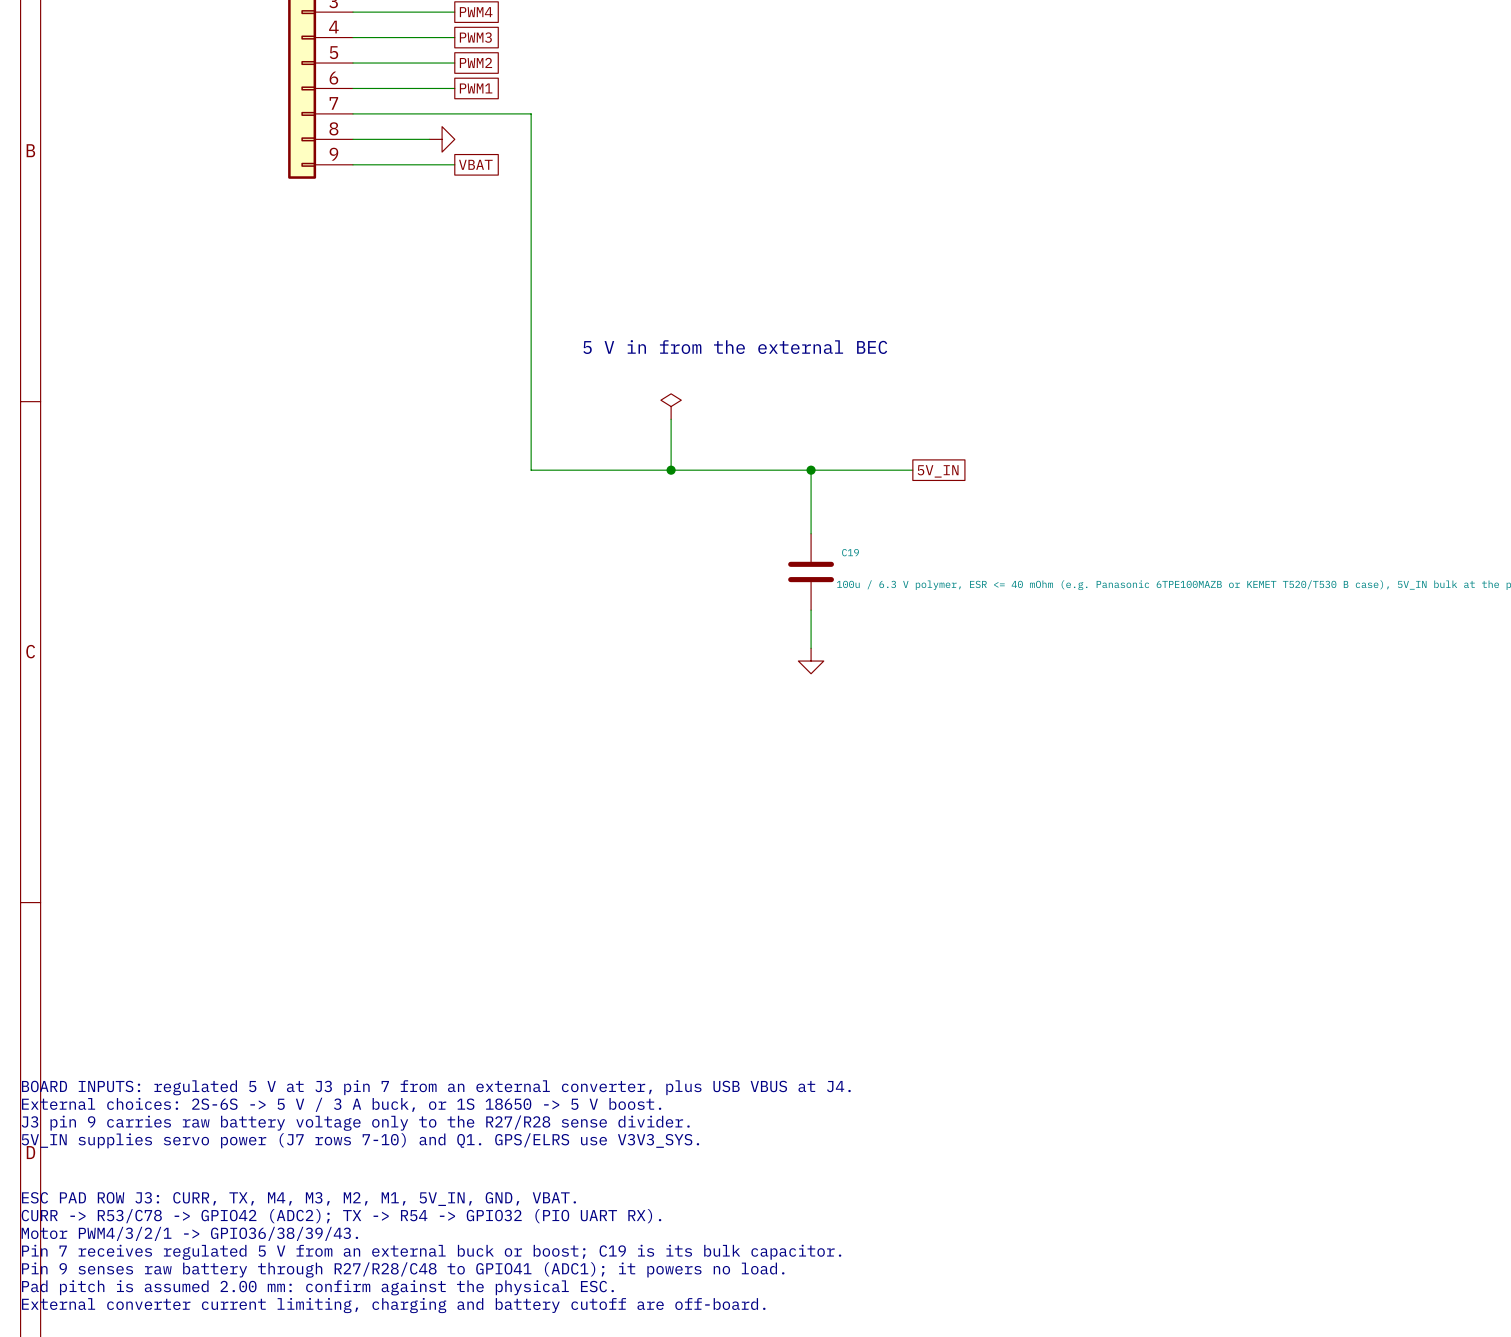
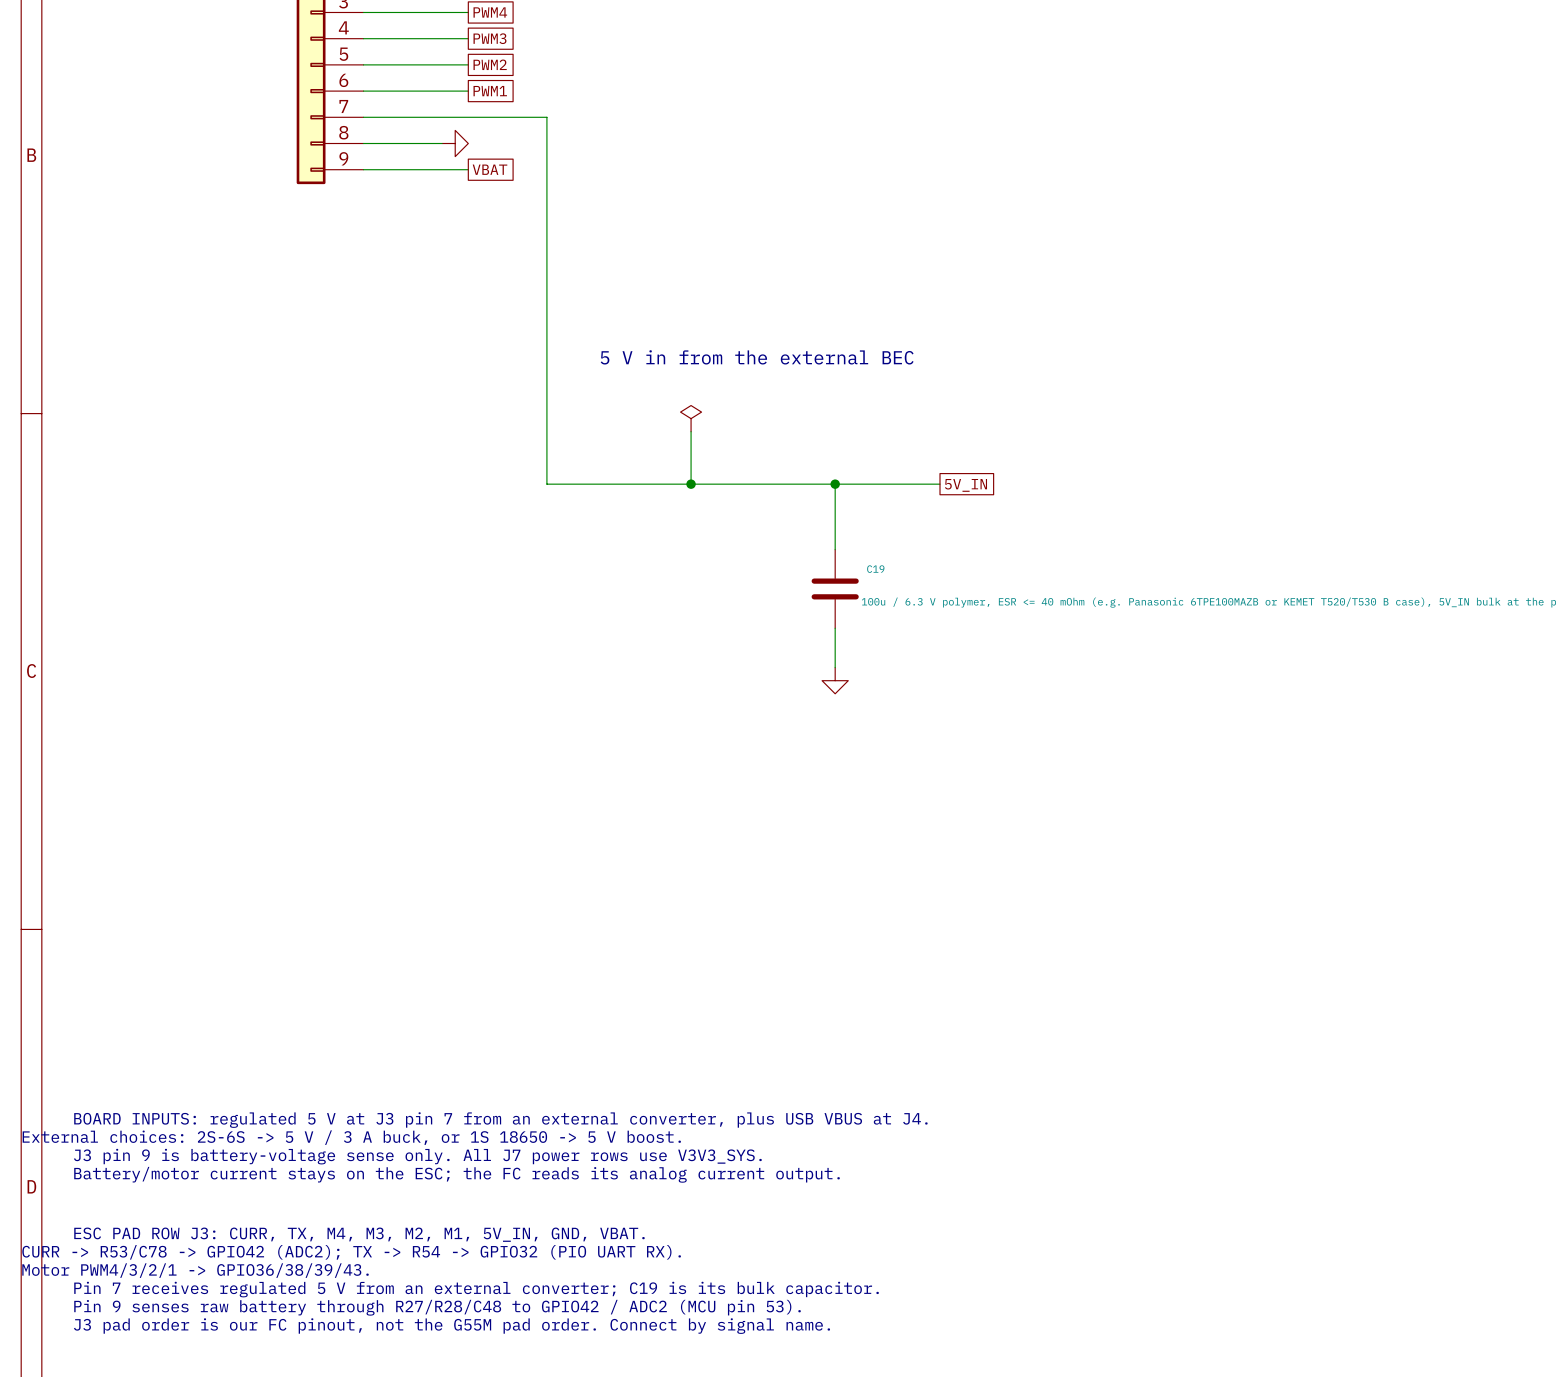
text position: BOARD INPUTS: regulated 5 V at J3 pin 7 from an external converter, plus USB VBUS at J4. (436, 1087) -> BOARD INPUTS: regulated 5 V at J3 pin 7 from an external converter, plus USB VBUS at J4. (500, 1120)
text: J3 pin 9 carries raw battery voltage only to the R27/R28 sense divider. (355, 1123) -> none
text: none -> J3 pin 9 is battery-voltage sense only. All J7 power rows use V3V3_SYS. (417, 1156)
text: 5V_IN supplies servo power (J7 rows 7-10) and Q1. GPS/ELRS use V3V3_SYS. (360, 1140) -> none
text: none -> Battery/motor current stays on the ESC; the FC reads its analog current output. (456, 1174)
text position: ESC PAD ROW J3: CURR, TX, M4, M3, M2, M1, 5V_IN, GND, VBAT. (298, 1199) -> ESC PAD ROW J3: CURR, TX, M4, M3, M2, M1, 5V_IN, GND, VBAT. (359, 1234)
text: Pin 7 receives regulated 5 V from an external buck or boost; C19 is its bulk capacitor. (431, 1252) -> Pin 7 receives regulated 5 V from an external converter; C19 is its bulk capacitor. (476, 1289)
text: Pin 9 senses raw battery through R27/R28/C48 to GPIO41 (ADC1); it powers no load. (403, 1269) -> Pin 9 senses raw battery through R27/R28/C48 to GPIO42 / ADC2 (MCU pin 53). (437, 1307)
text: Pad pitch is assumed 2.00 mm: confirm against the physical ESC. (317, 1287) -> none
text: none -> J3 pad order is our FC pinout, not the G55M pad order. Connect by signal name. (452, 1326)
text: External converter current limiting, charging and battery cutoff are off-board. (393, 1305) -> none

